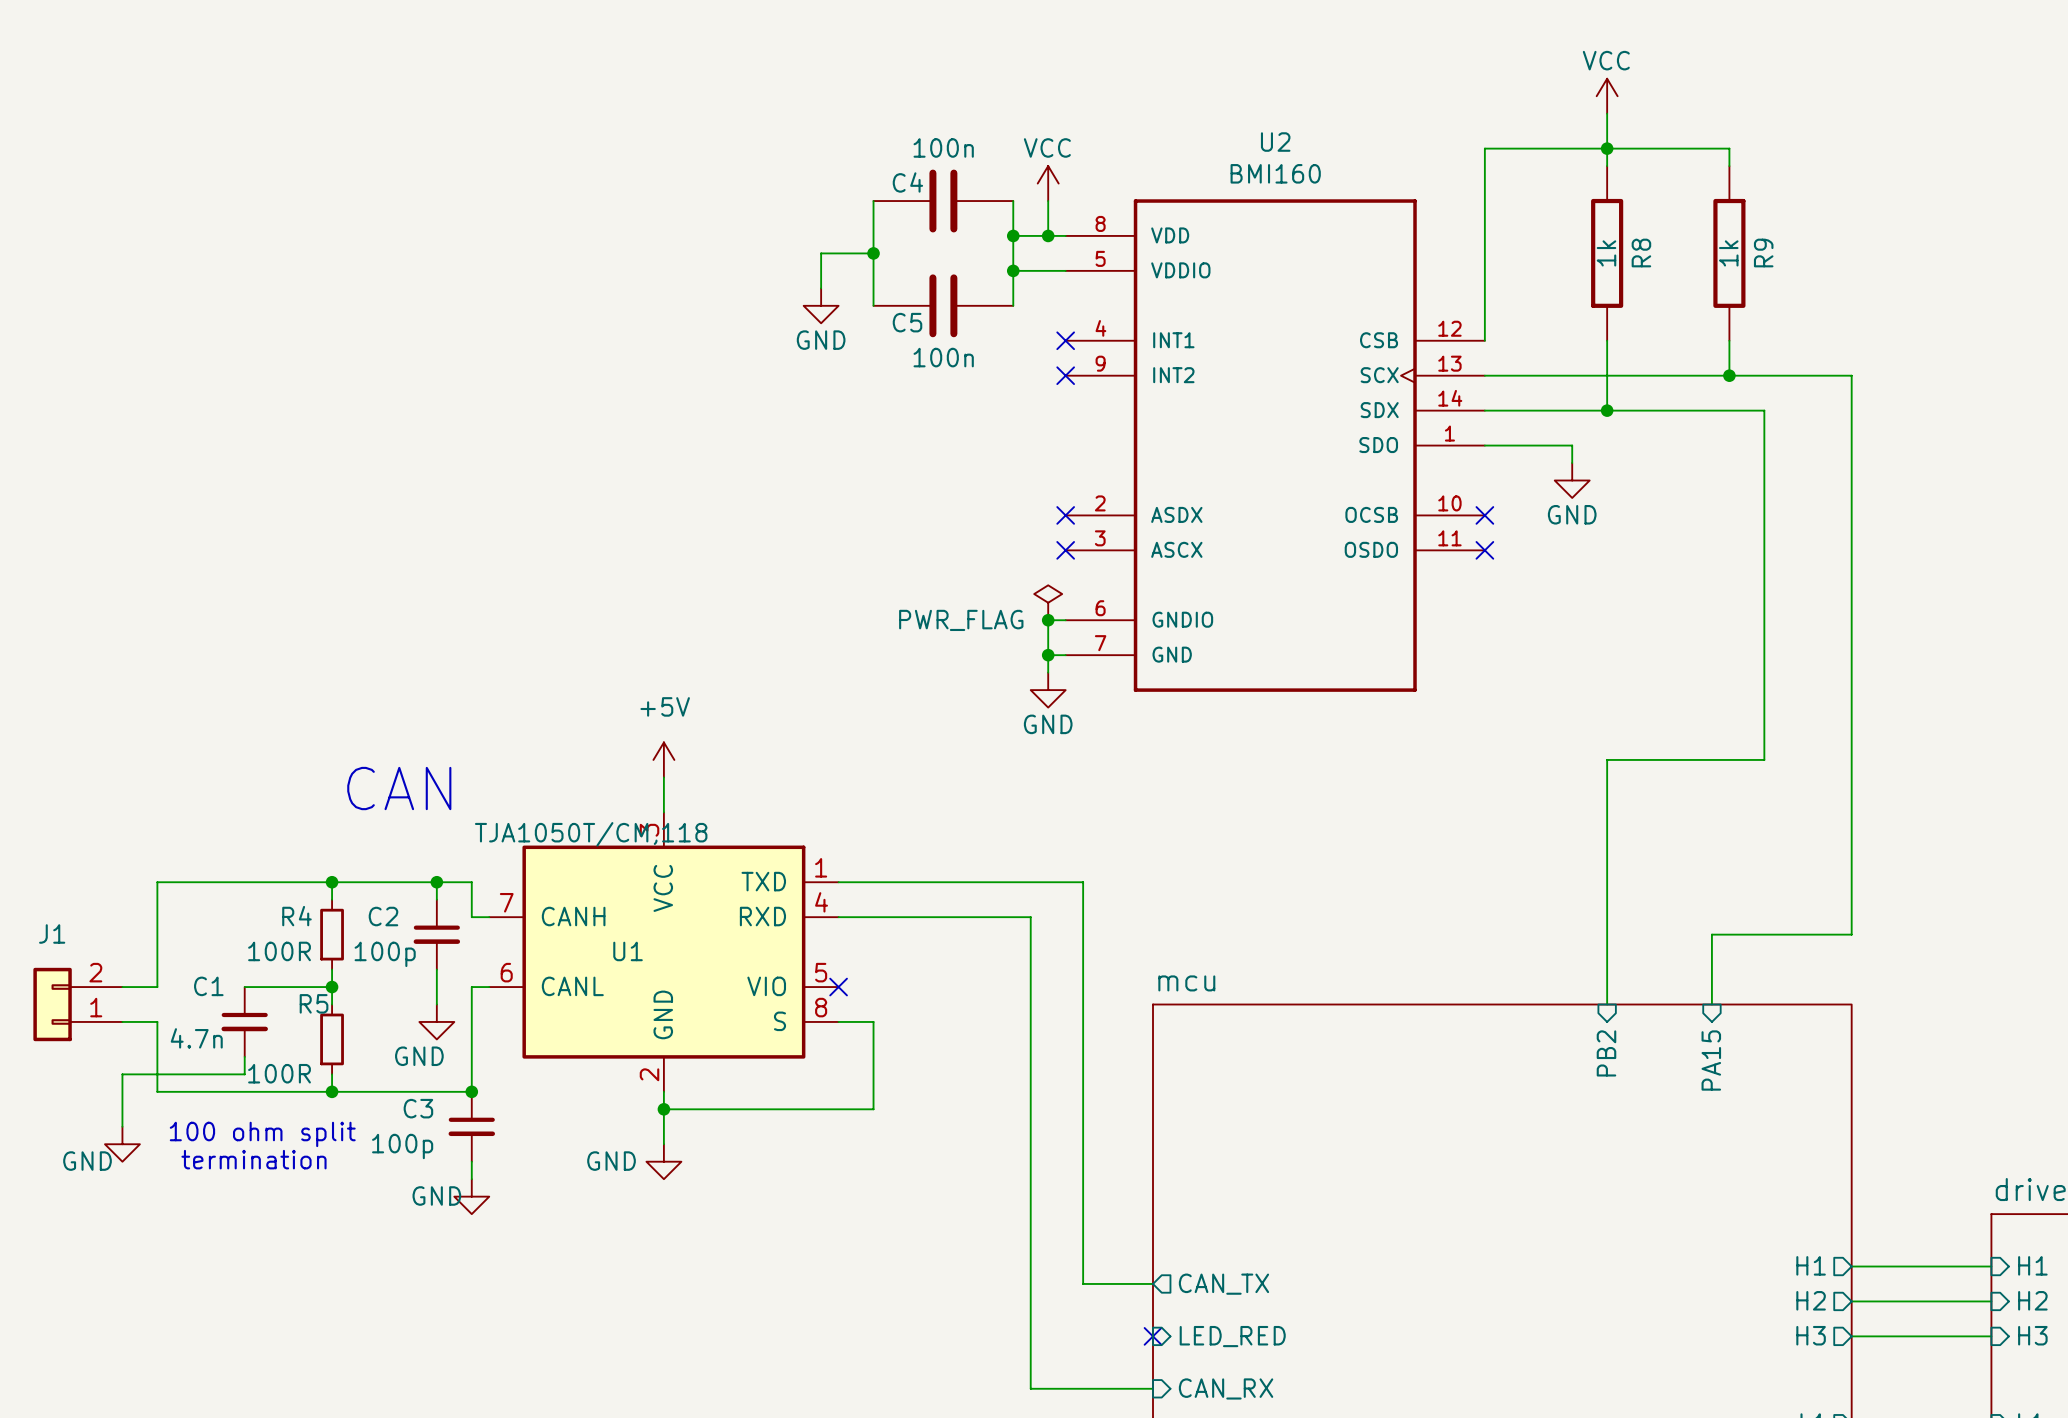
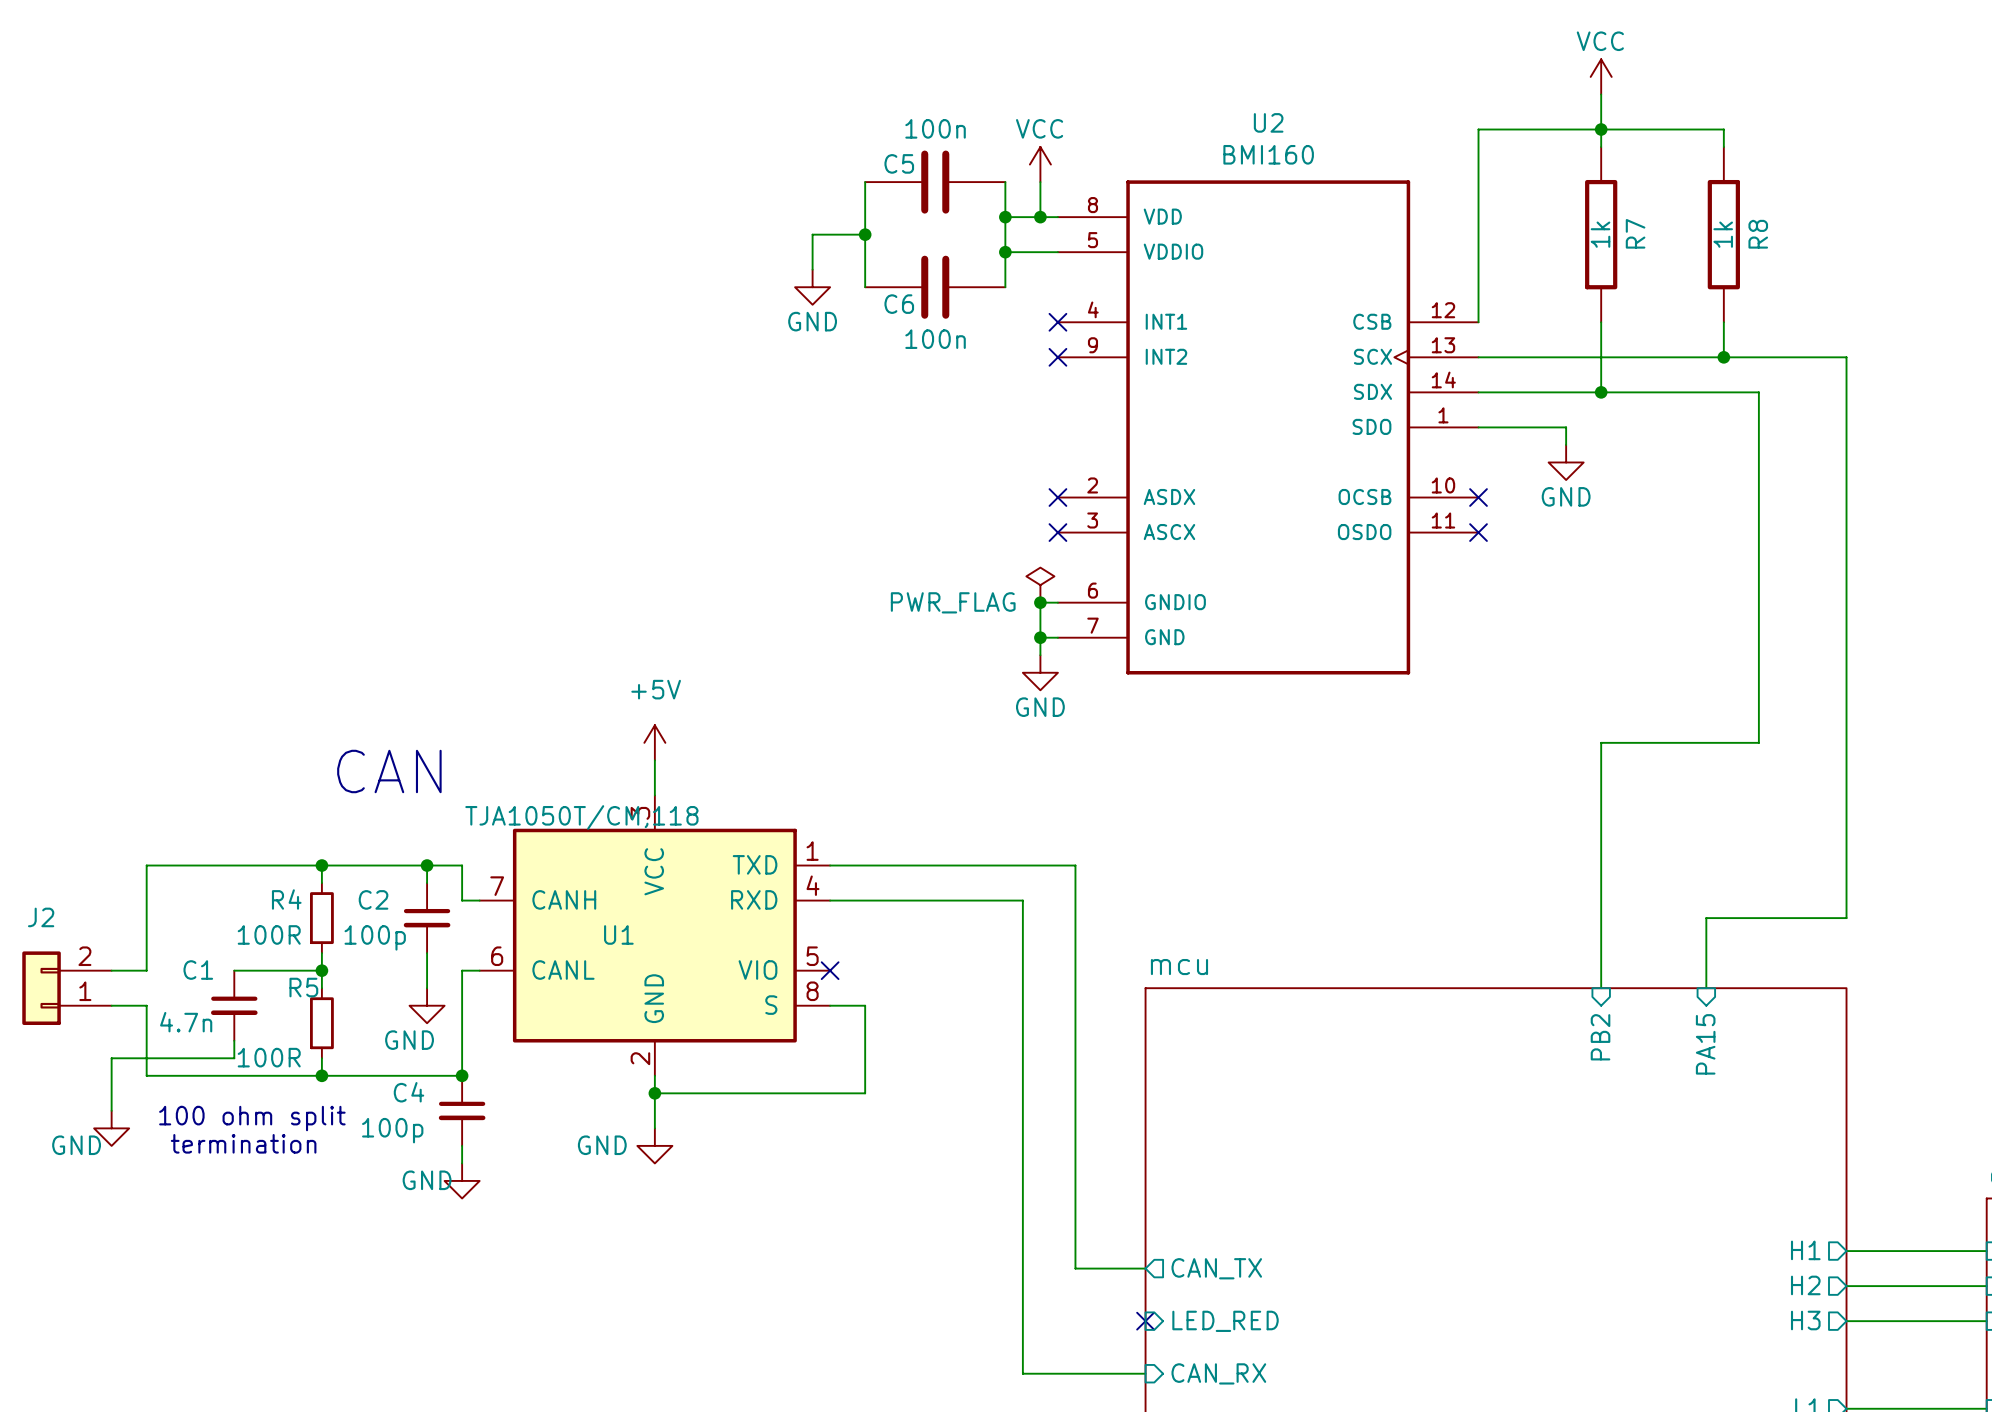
C4 name: C4 (907, 182) -> C5 (899, 163)
R8 name: R8 (1641, 253) -> R7 (1635, 233)
R9 name: R9 (1763, 253) -> R8 (1758, 234)
C5 name: C5 (907, 322) -> C6 (899, 304)
J1 name: J1 (52, 933) -> J2 (41, 917)
C3 name: C3 (418, 1108) -> C4 (408, 1092)

